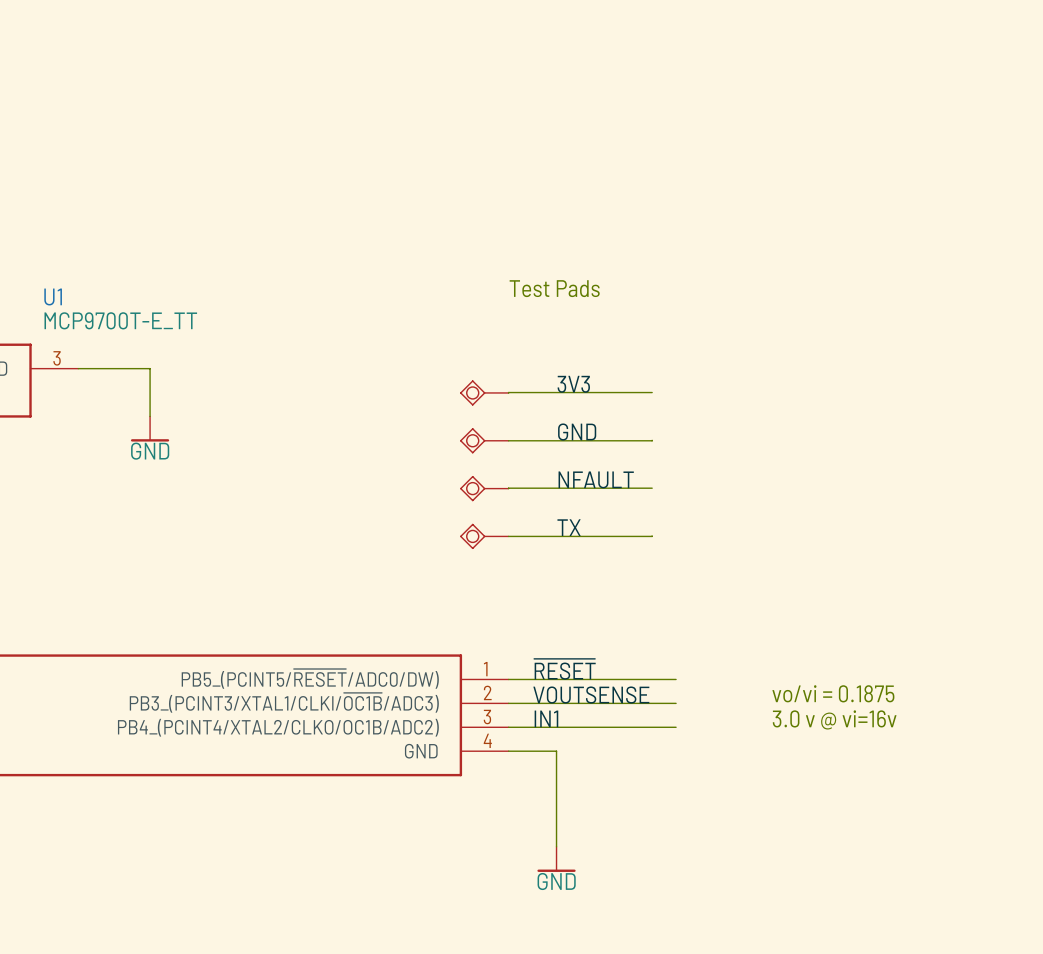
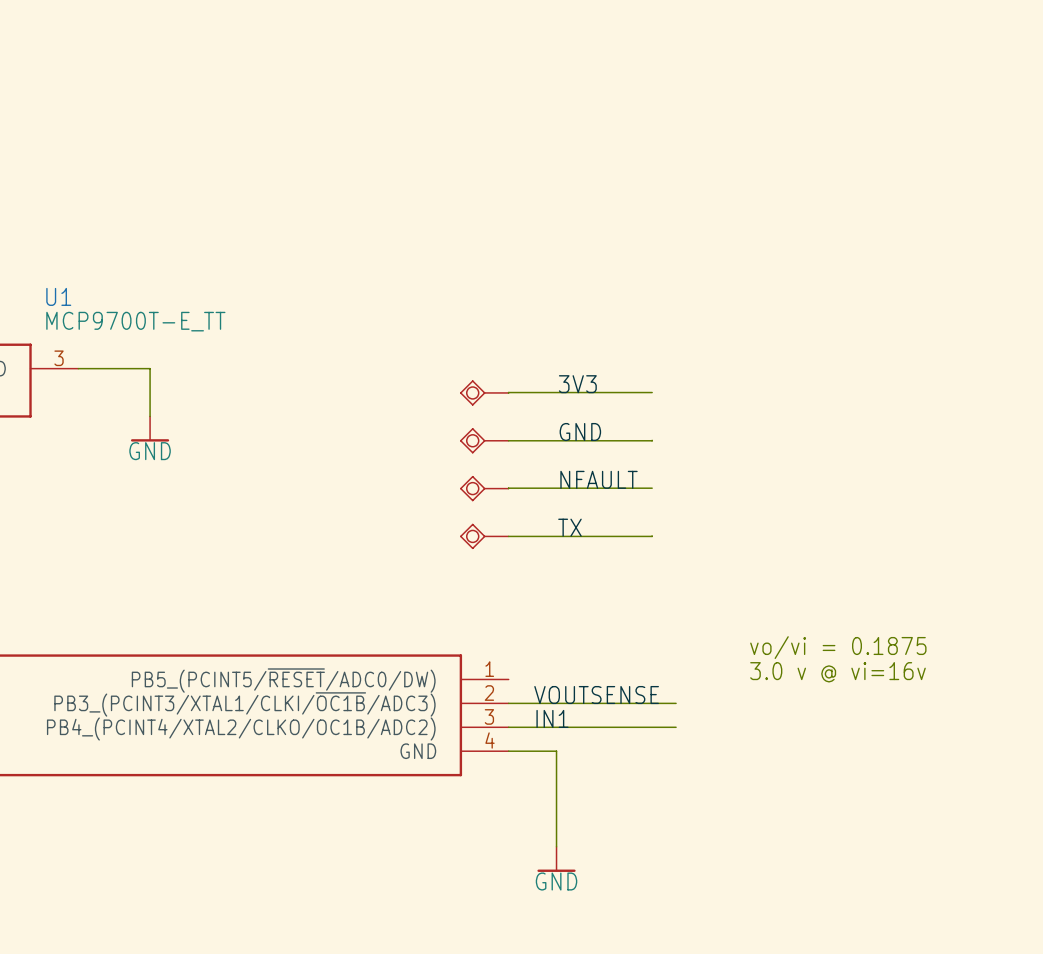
text: Test Pads (554, 288) -> none
label: ~{RESET} (564, 669) -> none
wire: (508, 679) (676, 679) -> none
text position: vo/vi = 0.1875 (833, 693) -> vo/vi = 0.1875 (838, 647)
text position: 3.0 v @ vi=16v (834, 719) -> 3.0 v @ vi=16v (837, 672)

